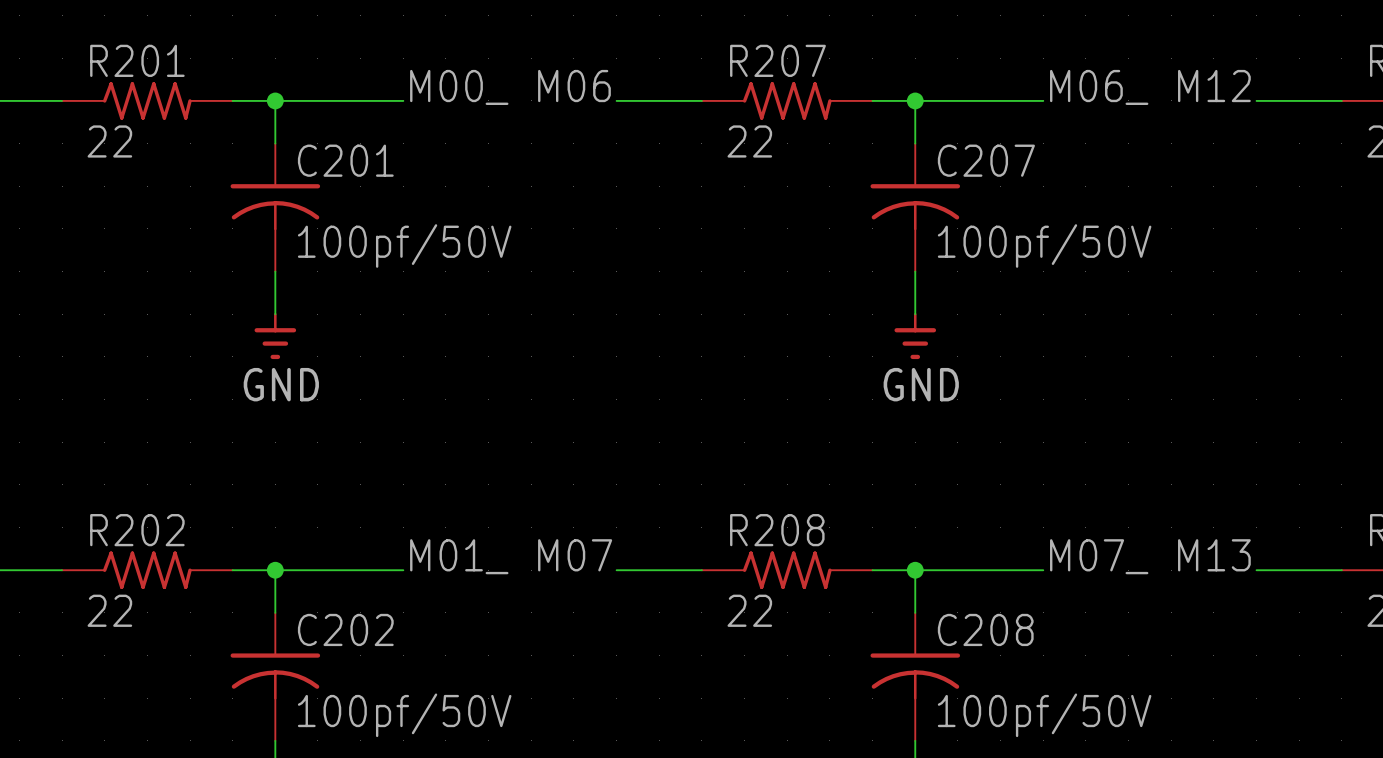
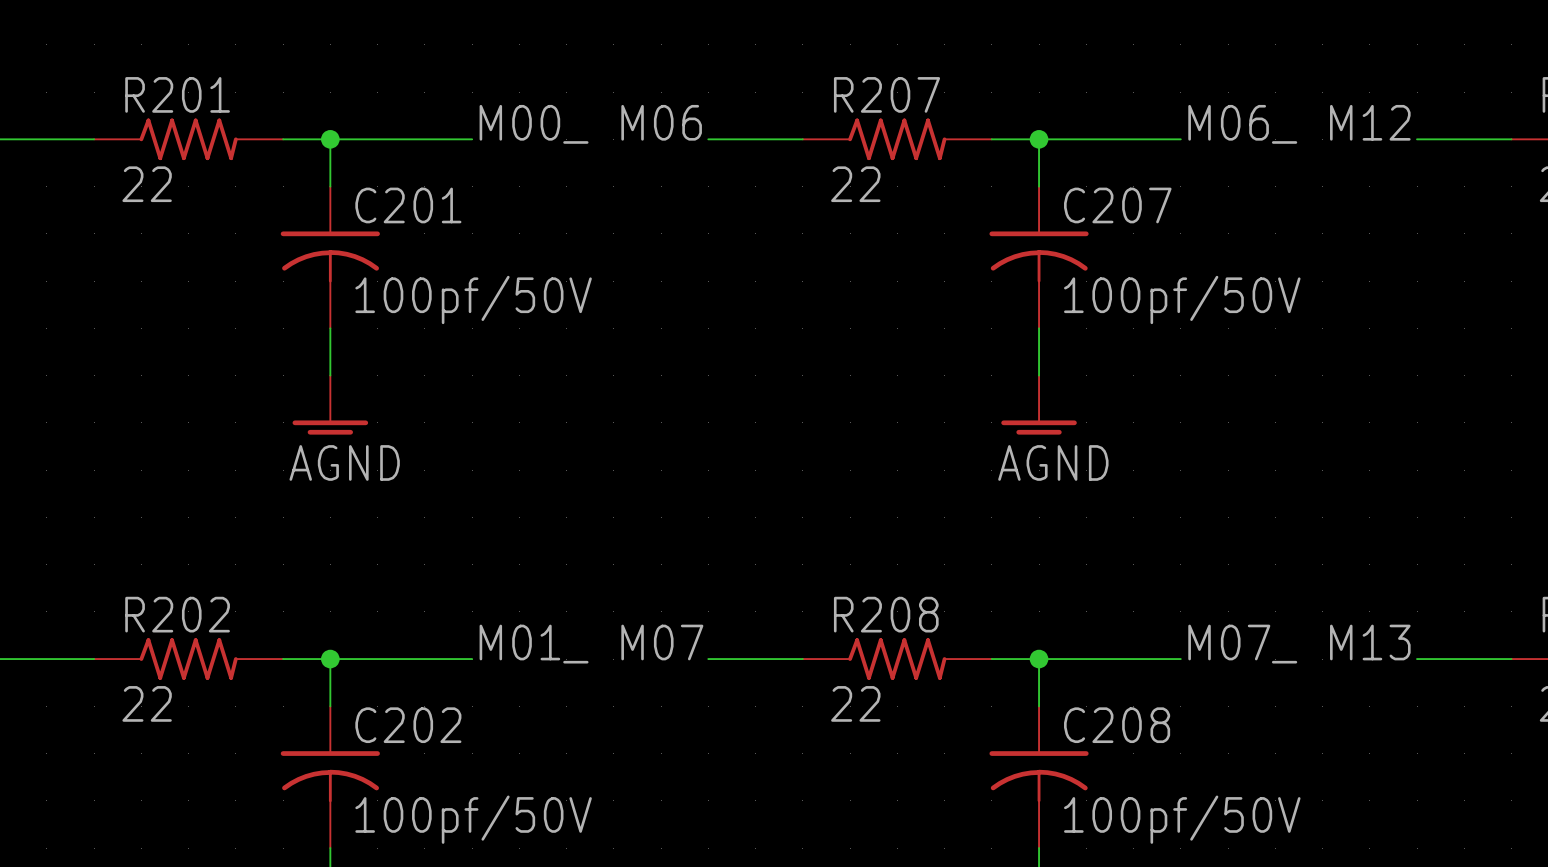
power symbol: GND (275, 336) -> AGND (330, 405)
power symbol: GND (915, 336) -> AGND (1039, 405)

